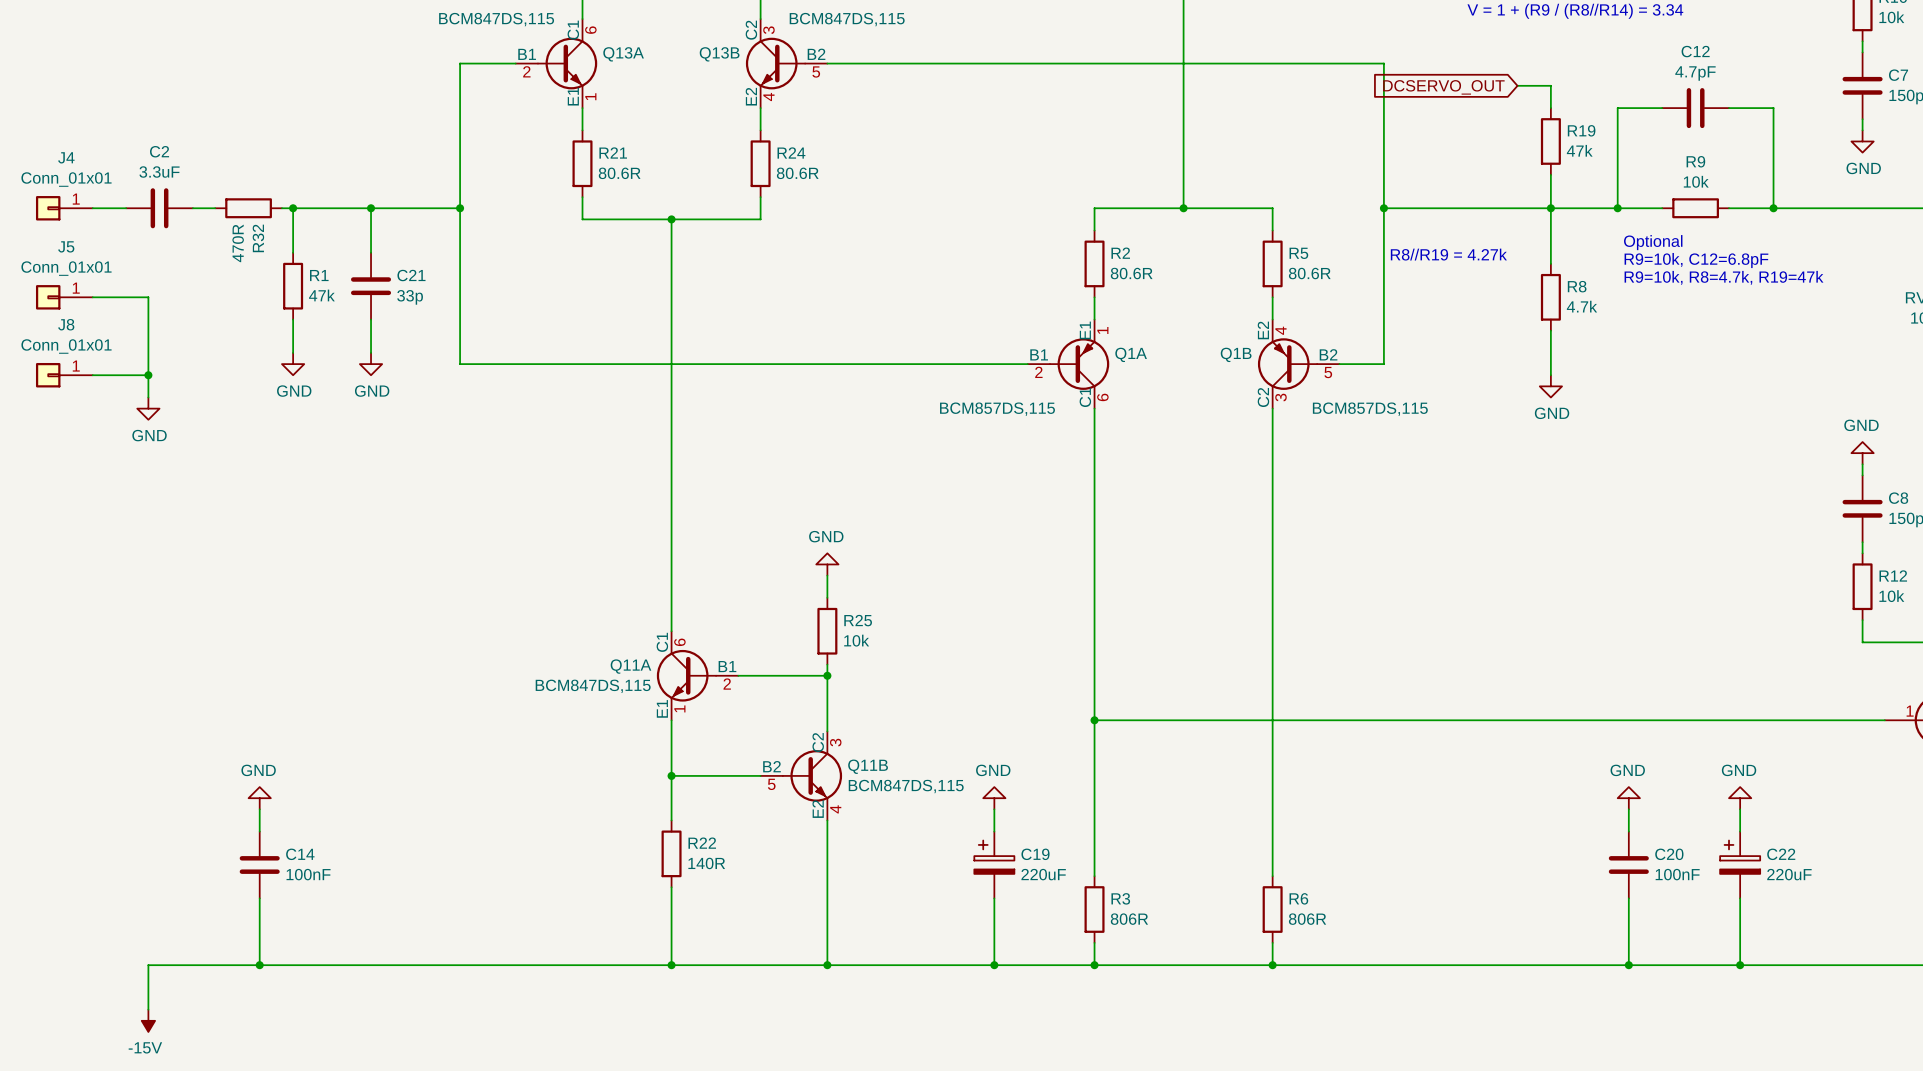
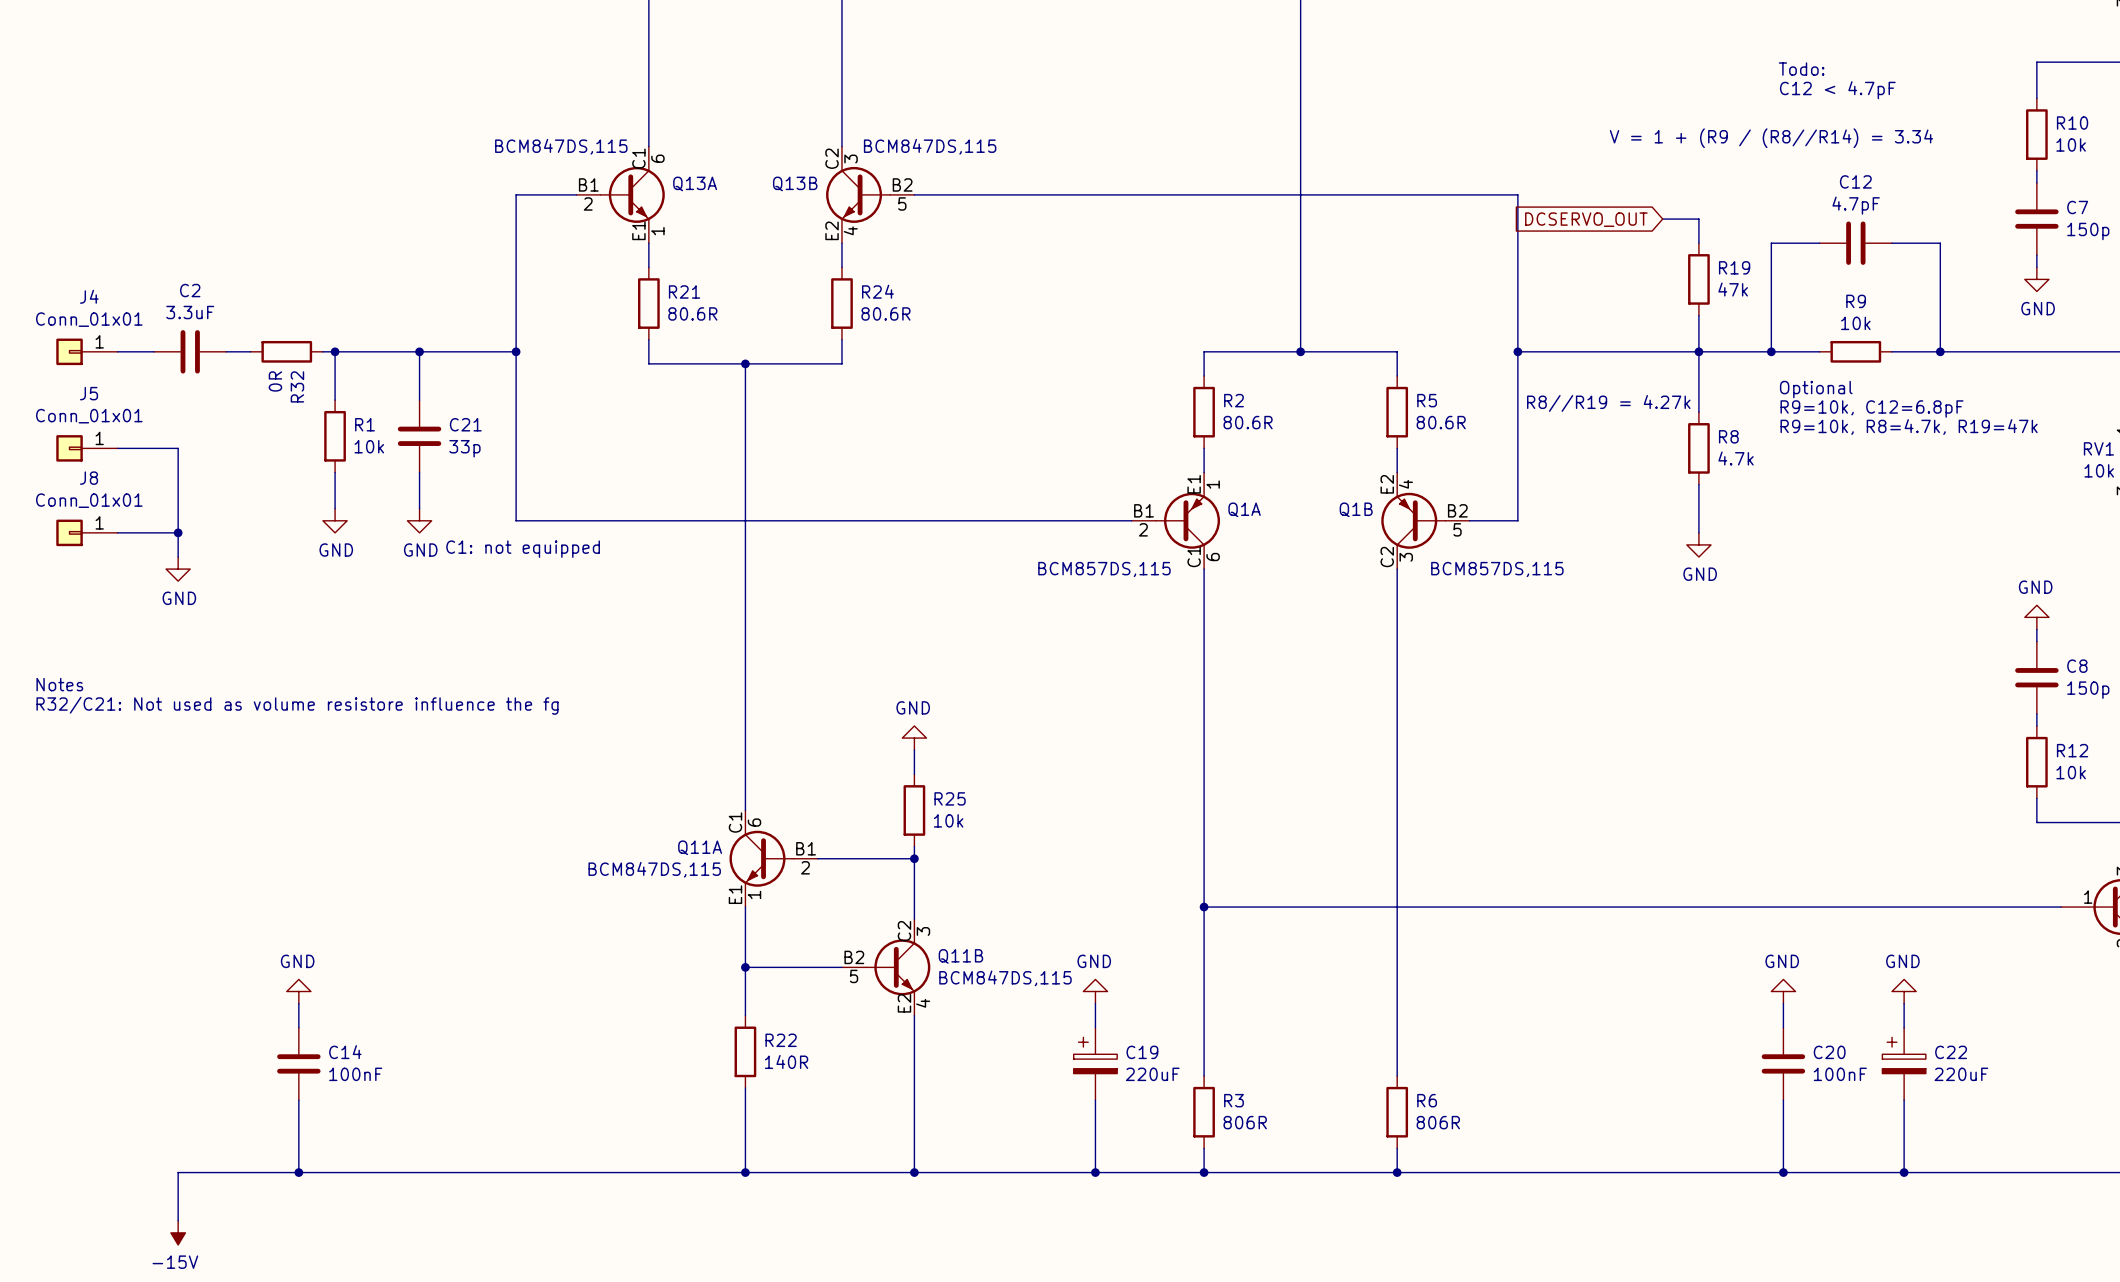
R32 value: 470R (238, 243) -> 0R (275, 381)
R1 value: 47k (321, 295) -> 10k (369, 446)
text: none -> C1: not equipped (523, 549)
text: none -> Notes (59, 684)
text: none -> R32/C21: Not used as volume resistore influence the fg (297, 705)

